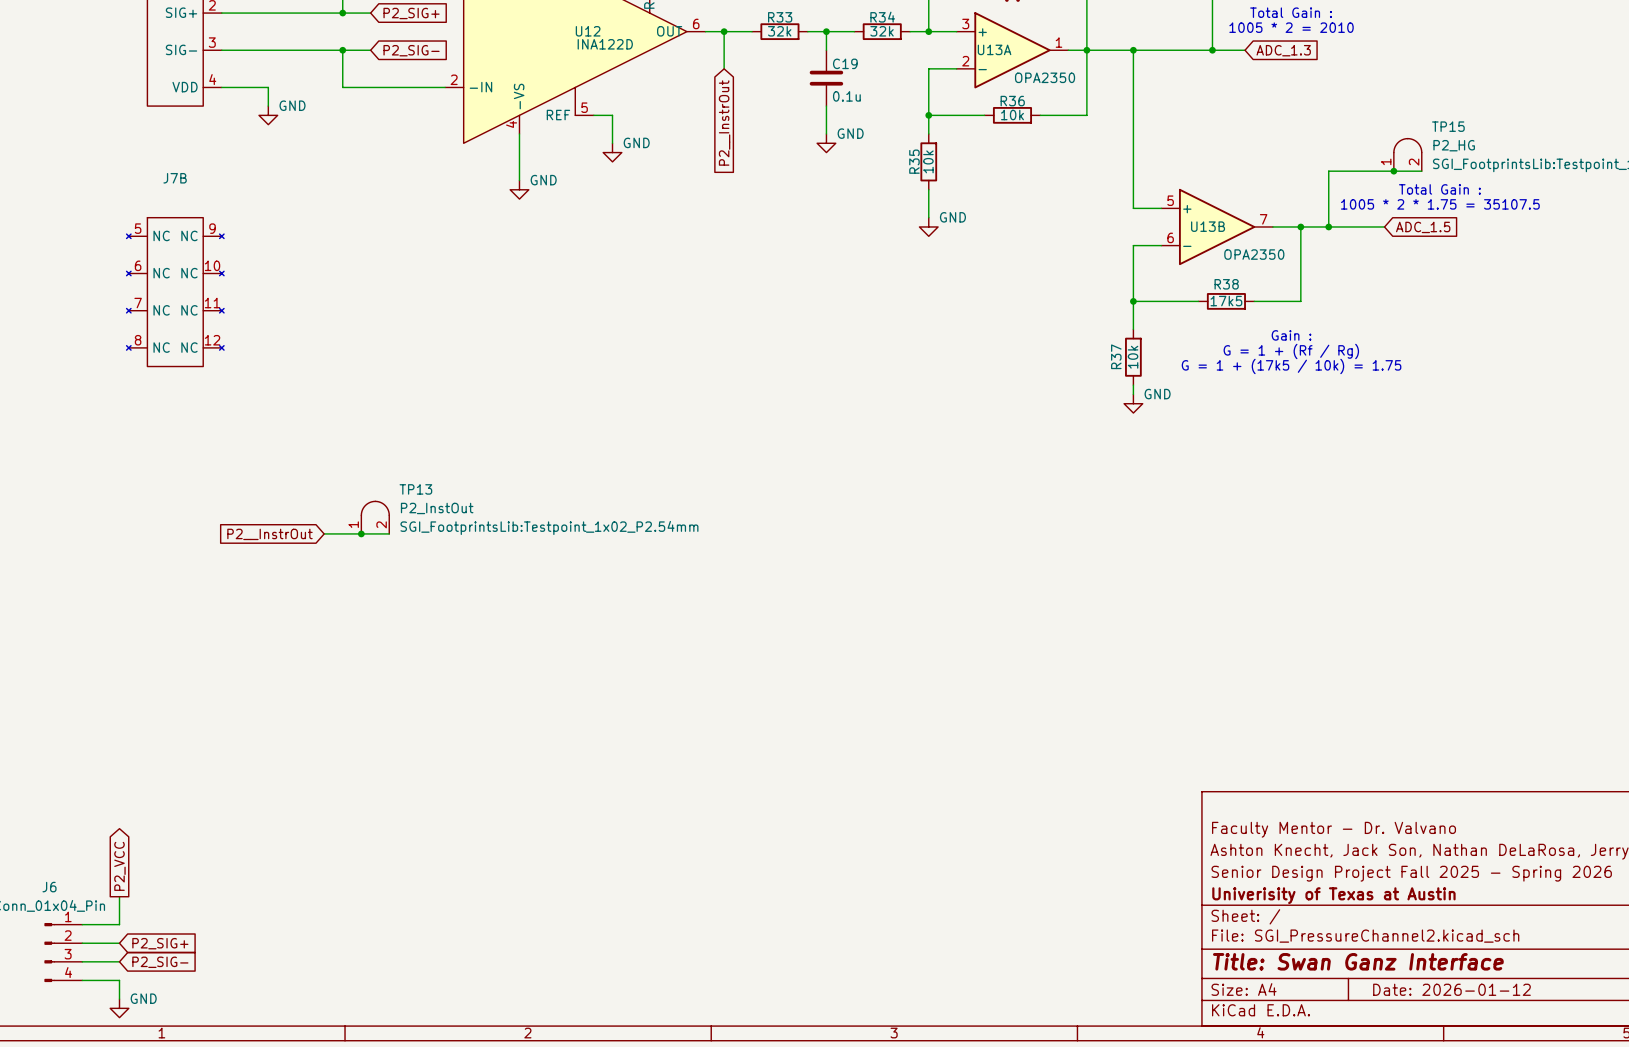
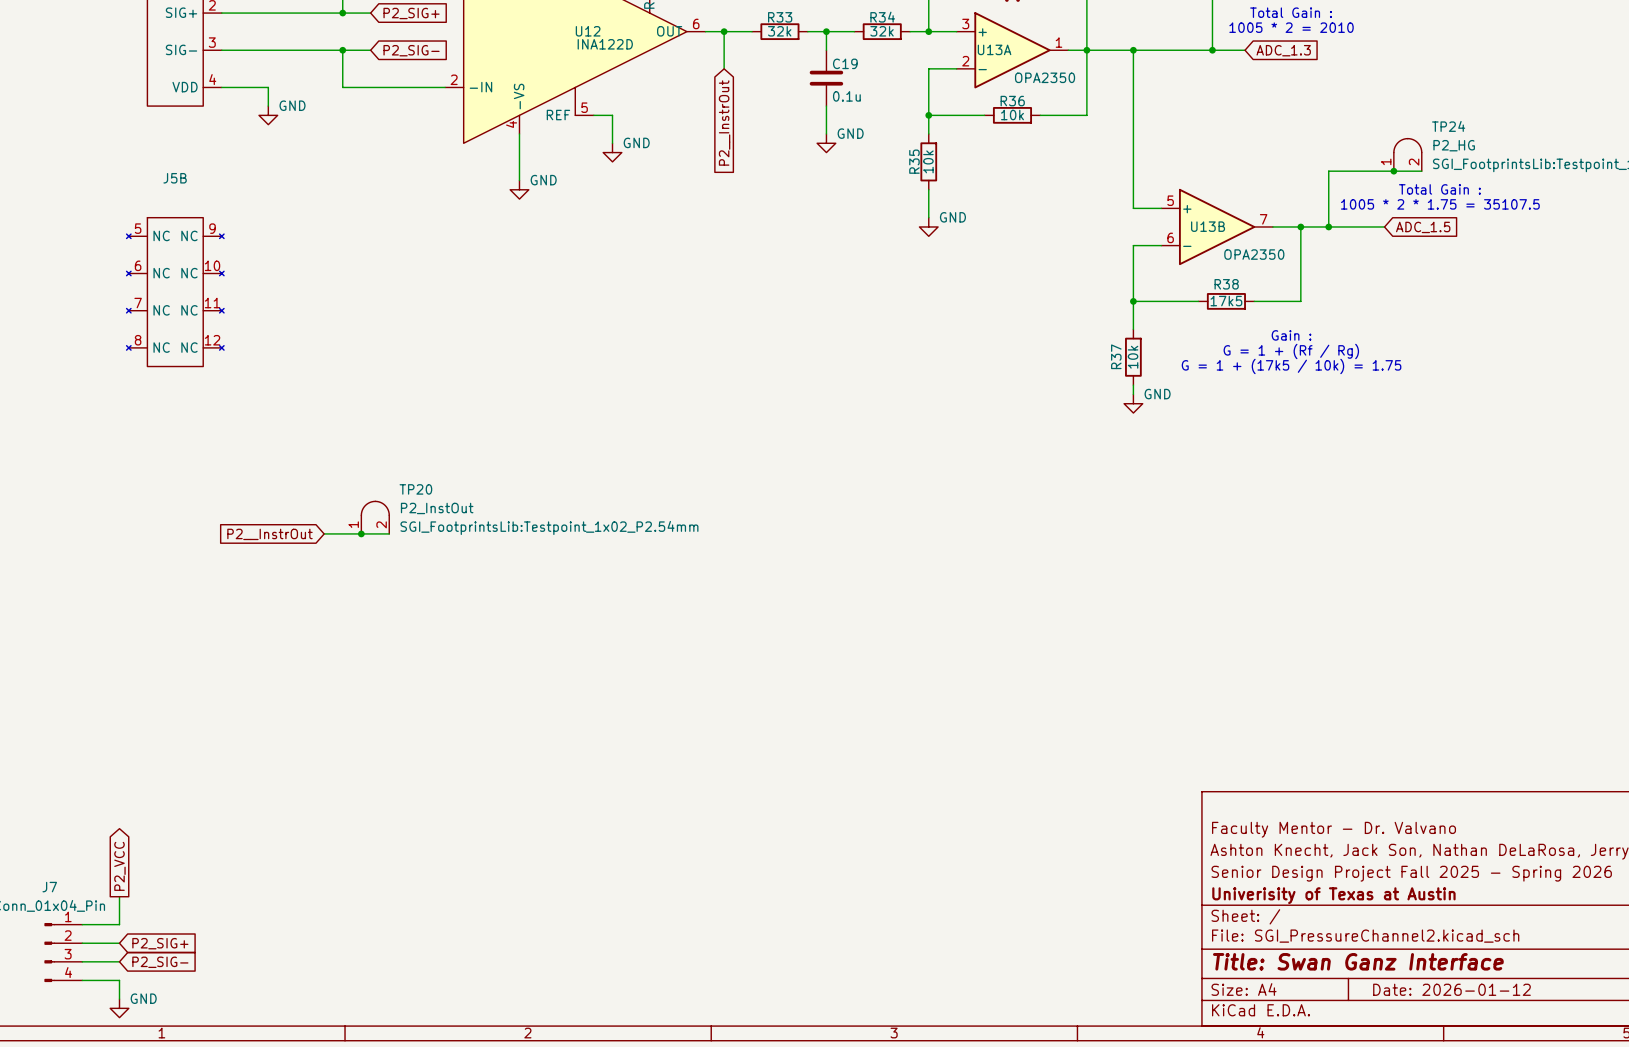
TP15 name: TP15 (1448, 126) -> TP24 (1448, 126)
J7B name: J7B (175, 178) -> J5B (175, 178)
TP13 name: TP13 (415, 489) -> TP20 (415, 489)
J6 name: J6 (49, 887) -> J7 (49, 887)

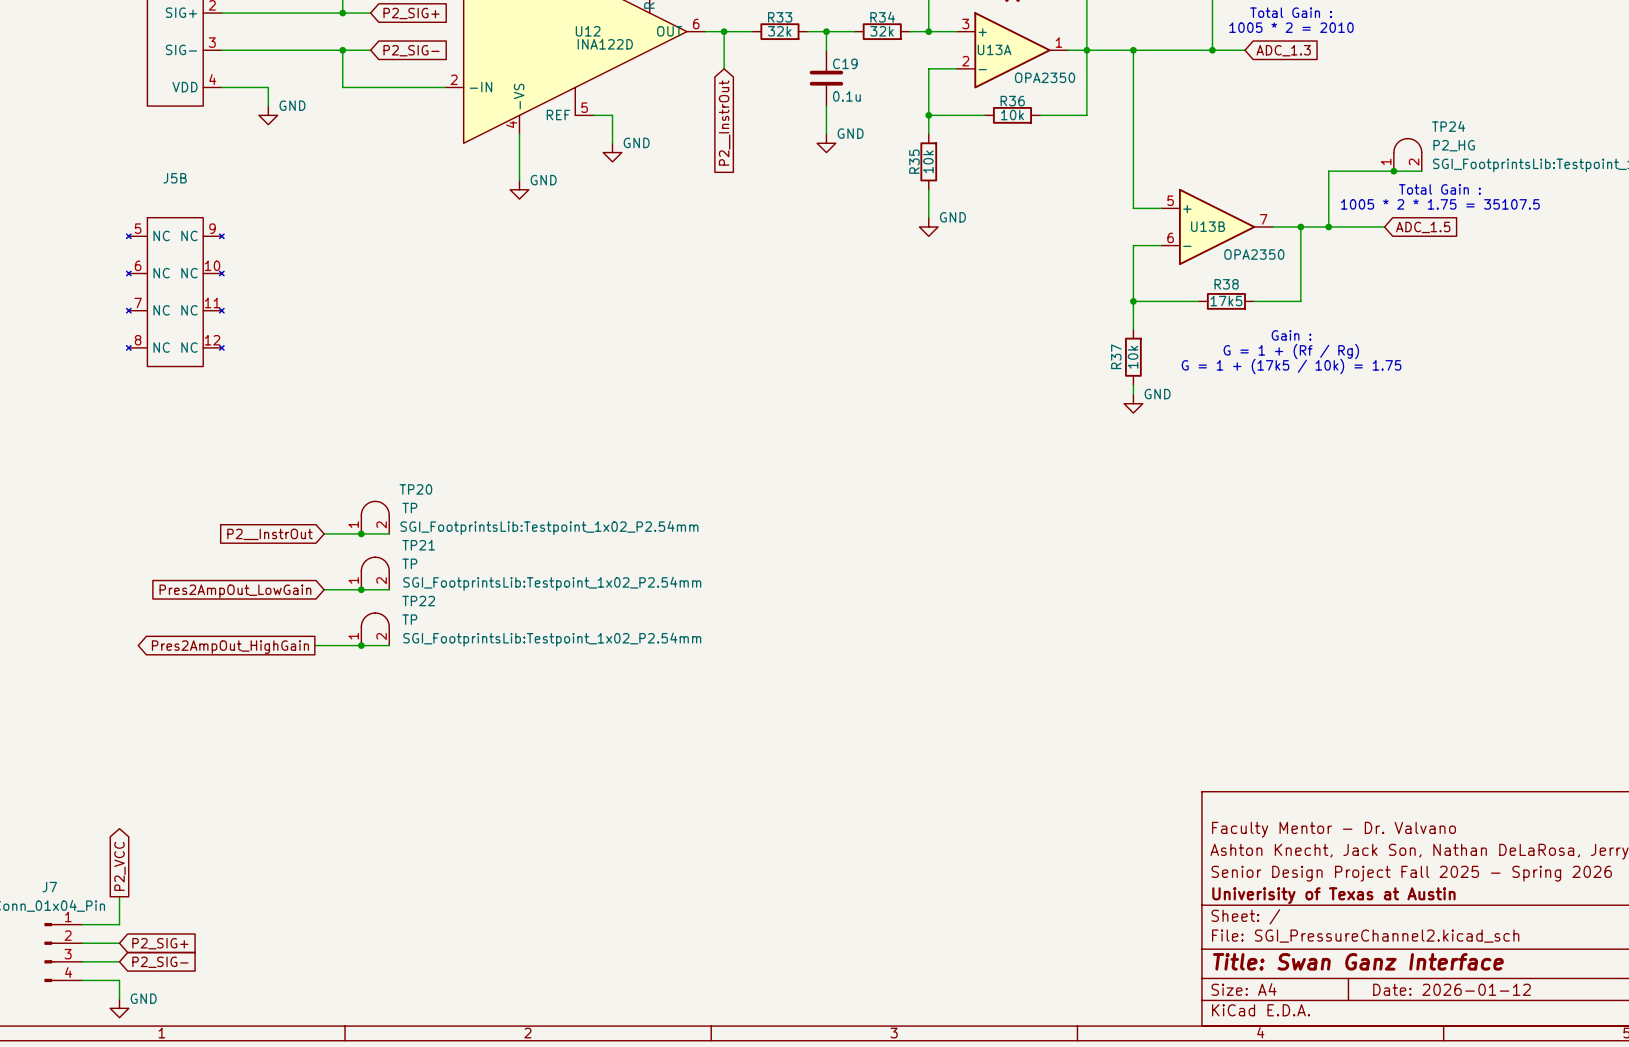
TP20 value: P2_InstOut (437, 508) -> TP (409, 508)
TP21: none -> TP (375, 573)
wire: none -> (324, 589) (389, 589)
junction: none -> (361, 589)
global label: none -> Pres2AmpOut_LowGain (235, 591)
TP22: none -> TP (375, 629)
wire: none -> (314, 645) (389, 645)
junction: none -> (361, 645)
global label: none -> Pres2AmpOut_HighGain (230, 647)

